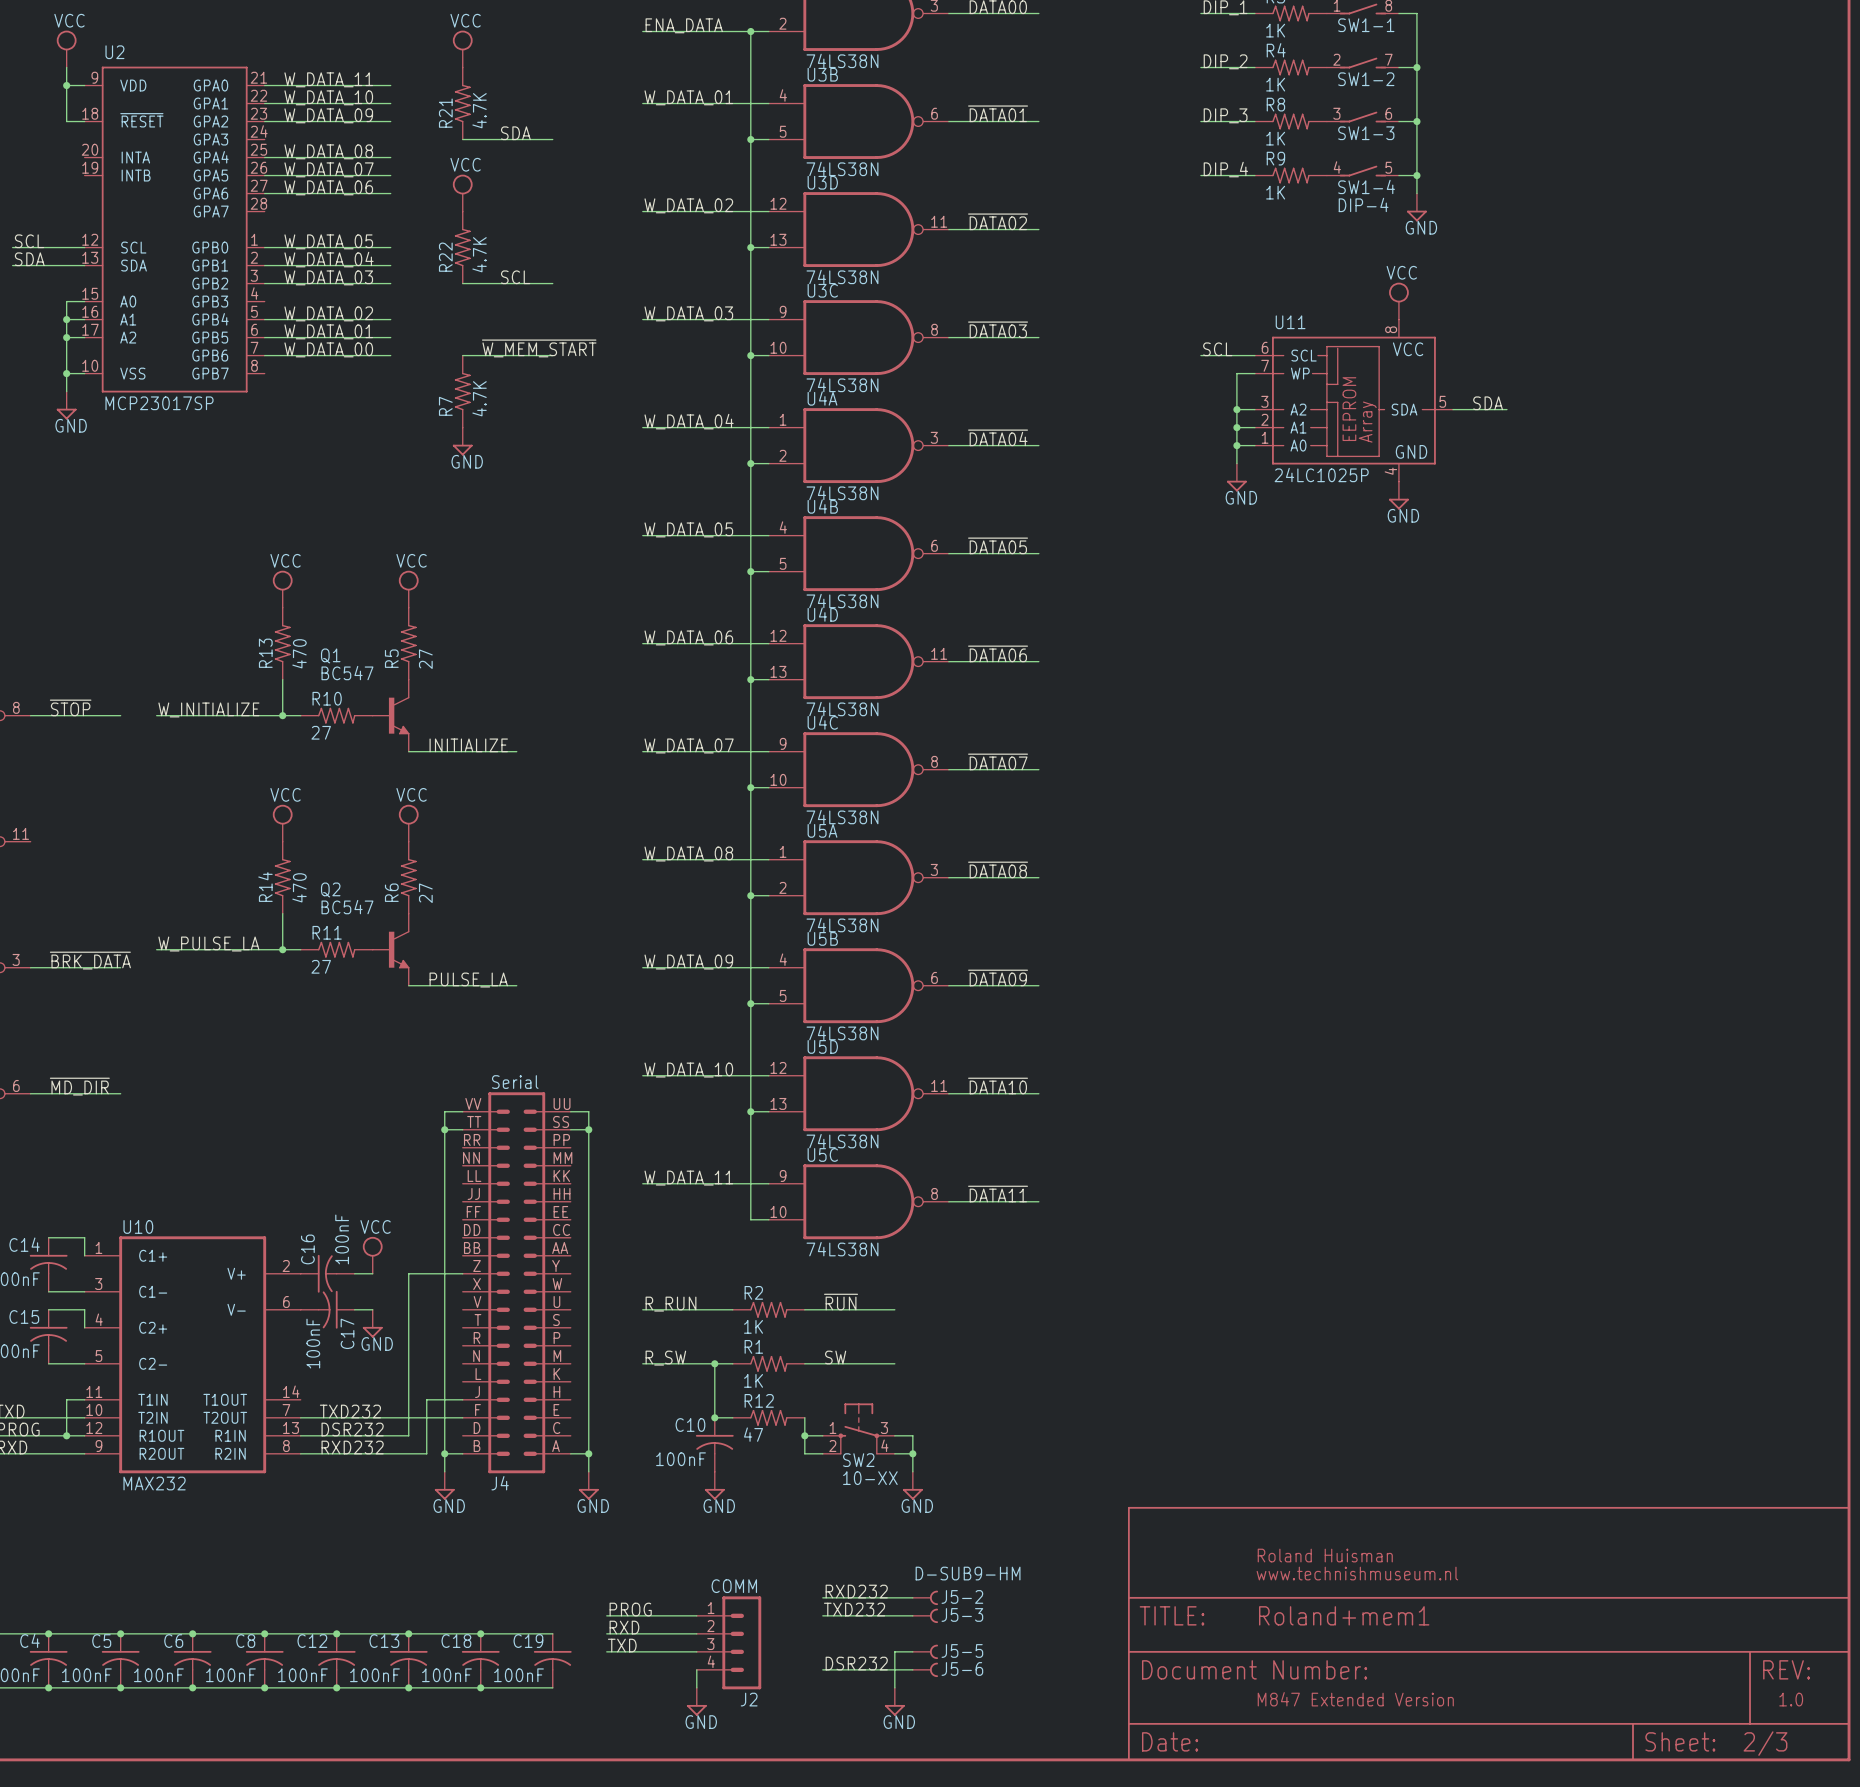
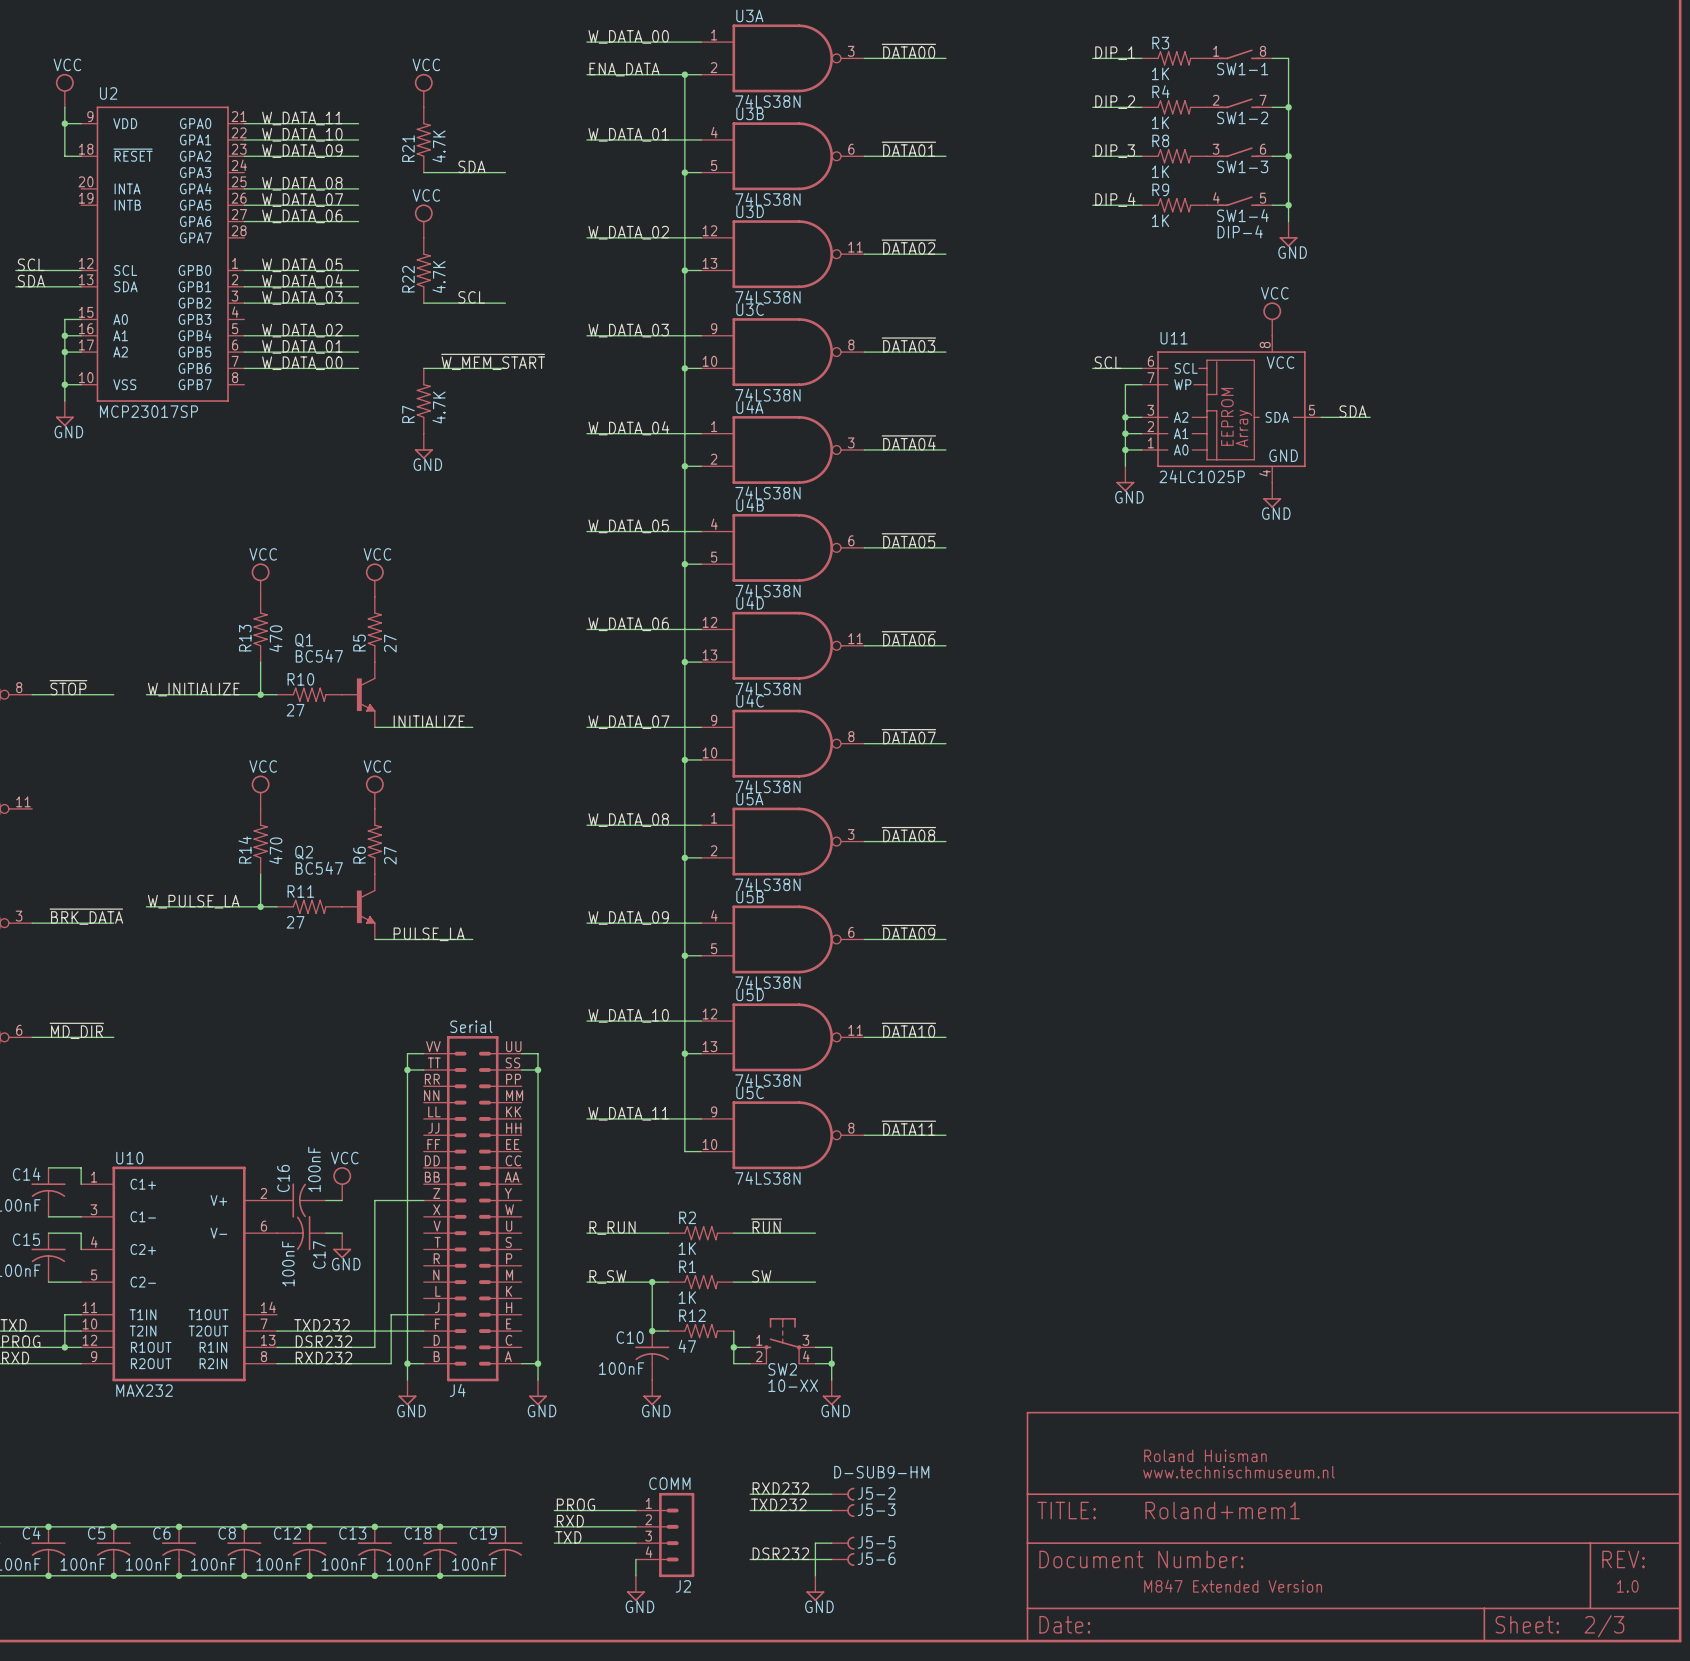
text: www.technishmuseum.nl (1357, 1573) -> www.technischmuseum.nl (1238, 1472)

